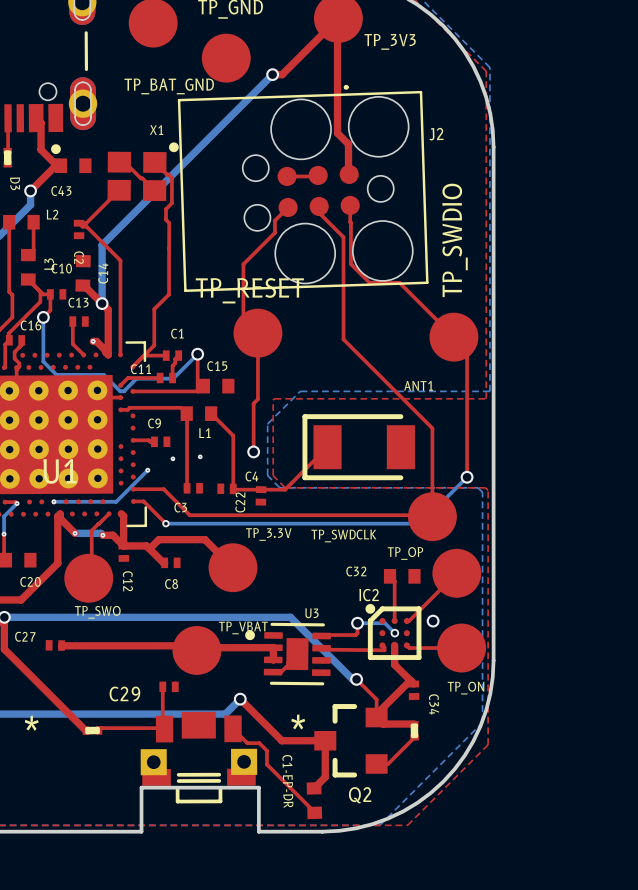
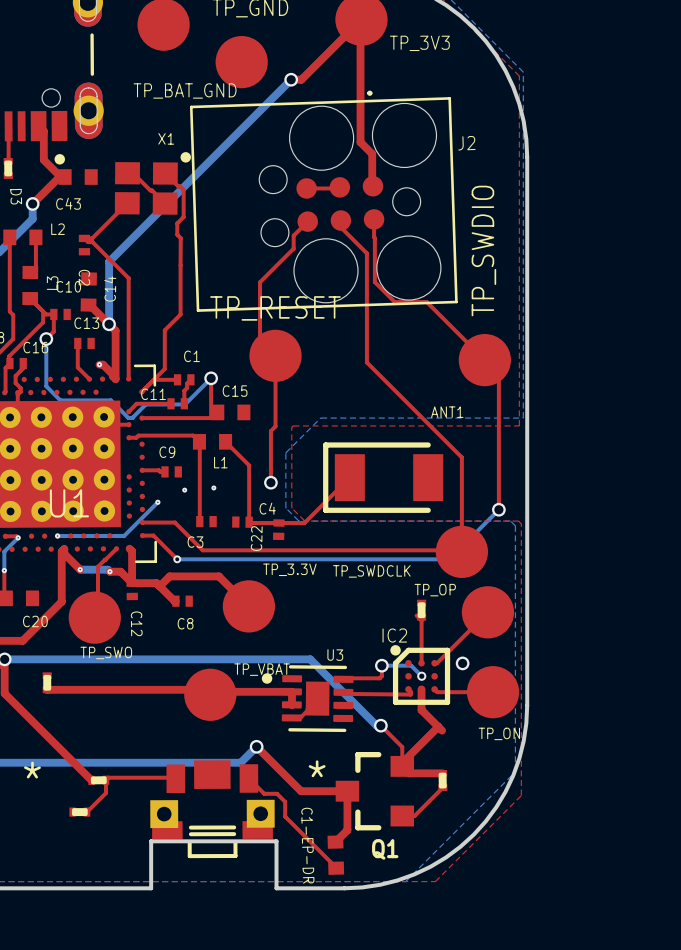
part: none -> (421, 610)
C32: (402, 576) -> none
part: none -> (47, 682)
top track: none -> (47, 689) (66, 689)
C27: (55, 645) -> none
top track: (162, 686) (162, 728) -> none
C29: (169, 686) -> none
C34: (413, 690) -> none
top track: none -> (105, 780) (105, 793) (87, 812)
part: none -> (79, 812)
Q2 name: Q2 (360, 795) -> Q1 (385, 849)

